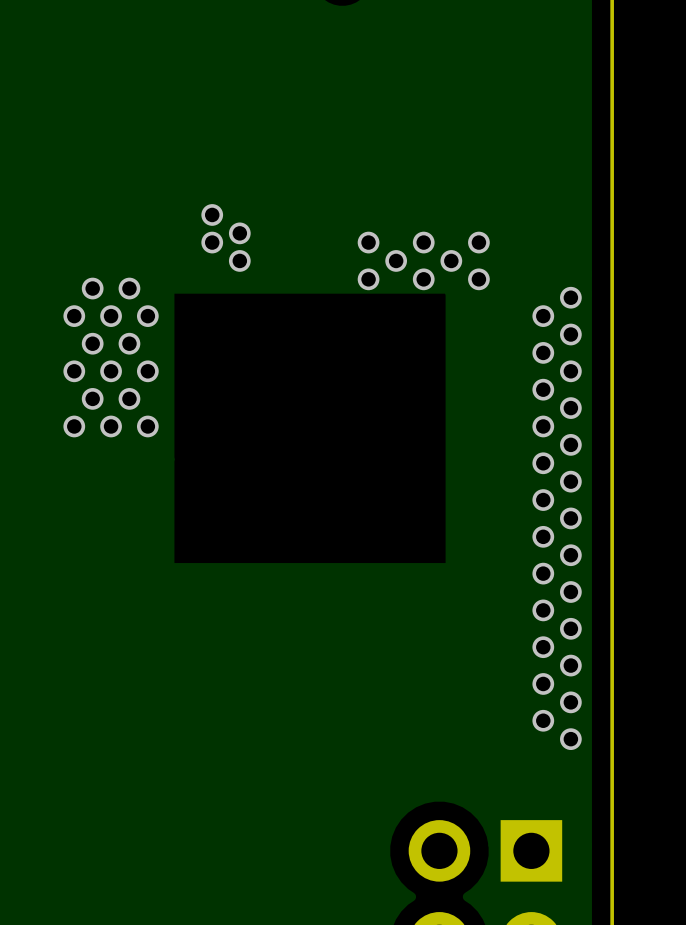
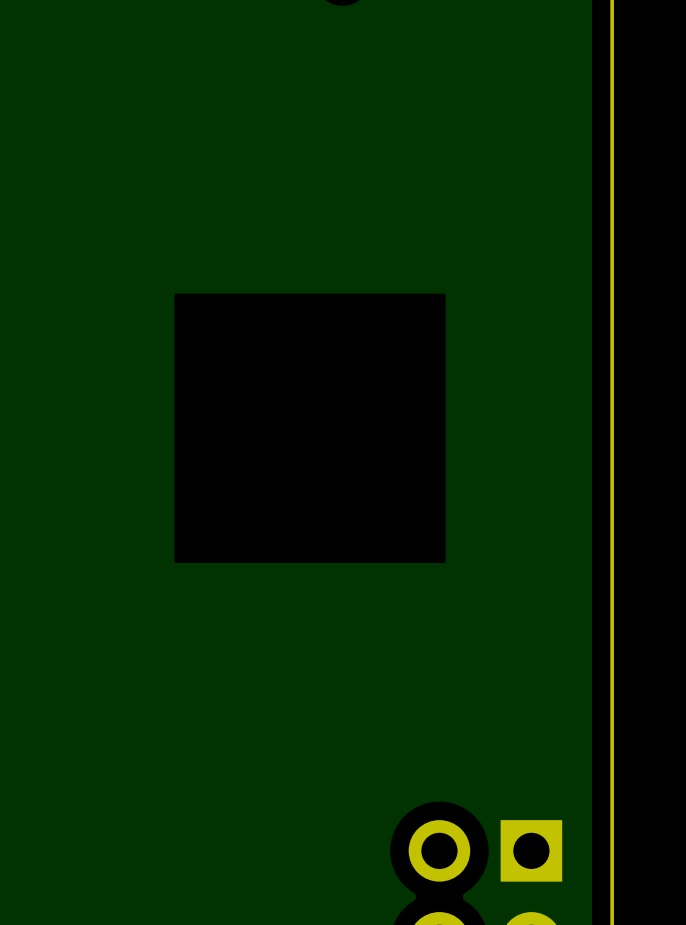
via: (212, 214) -> none
via: (239, 233) -> none
via: (212, 242) -> none
via: (368, 242) -> none
via: (423, 242) -> none
via: (478, 242) -> none
via: (239, 260) -> none
via: (396, 260) -> none
via: (451, 260) -> none
via: (368, 279) -> none
via: (423, 279) -> none
via: (478, 279) -> none
via: (92, 288) -> none
via: (129, 288) -> none
via: (570, 297) -> none
via: (74, 316) -> none
via: (111, 316) -> none
via: (147, 316) -> none
via: (543, 316) -> none
via: (570, 334) -> none
via: (92, 343) -> none
via: (129, 343) -> none
via: (543, 352) -> none
via: (74, 371) -> none
via: (111, 371) -> none
via: (147, 371) -> none
via: (570, 371) -> none
via: (543, 389) -> none
via: (92, 398) -> none
via: (129, 398) -> none
via: (570, 408) -> none
via: (74, 426) -> none
via: (111, 426) -> none
via: (147, 426) -> none
via: (543, 426) -> none
via: (570, 444) -> none
via: (543, 463) -> none
via: (570, 481) -> none
via: (543, 500) -> none
via: (570, 518) -> none
via: (543, 536) -> none
via: (570, 555) -> none
via: (543, 573) -> none
via: (570, 592) -> none
via: (543, 610) -> none
via: (570, 628) -> none
via: (543, 647) -> none
via: (570, 665) -> none
via: (543, 683) -> none
via: (570, 702) -> none
via: (543, 720) -> none
via: (570, 739) -> none

